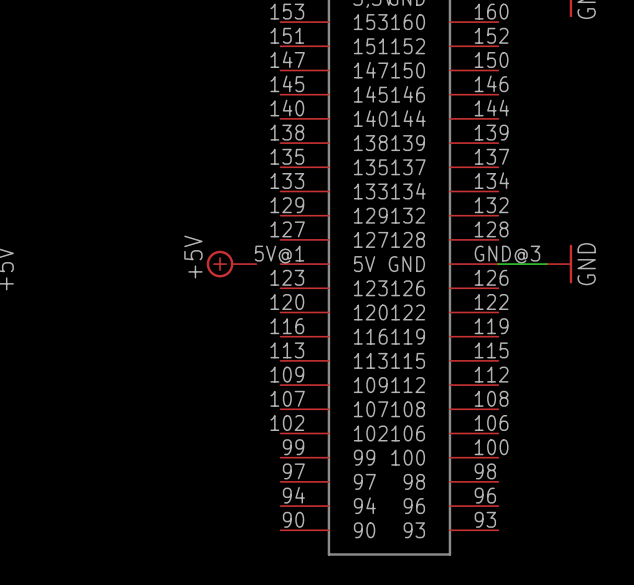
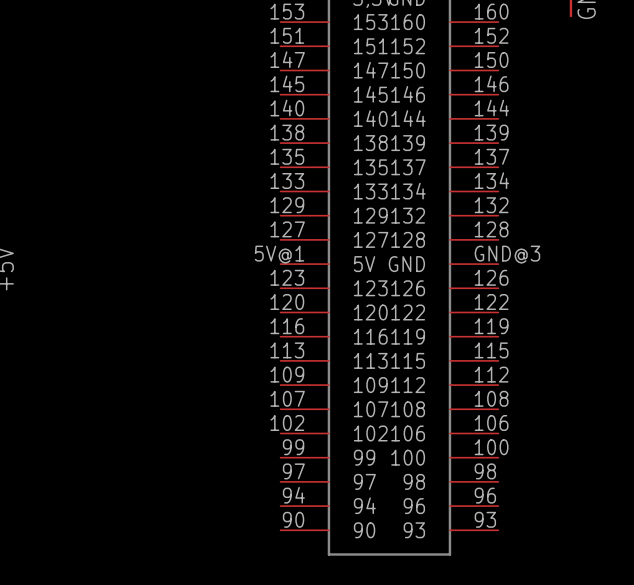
power symbol: +5V (231, 264) -> none
wire: (498, 264) (546, 264) -> none
power symbol: GND (559, 264) -> none

